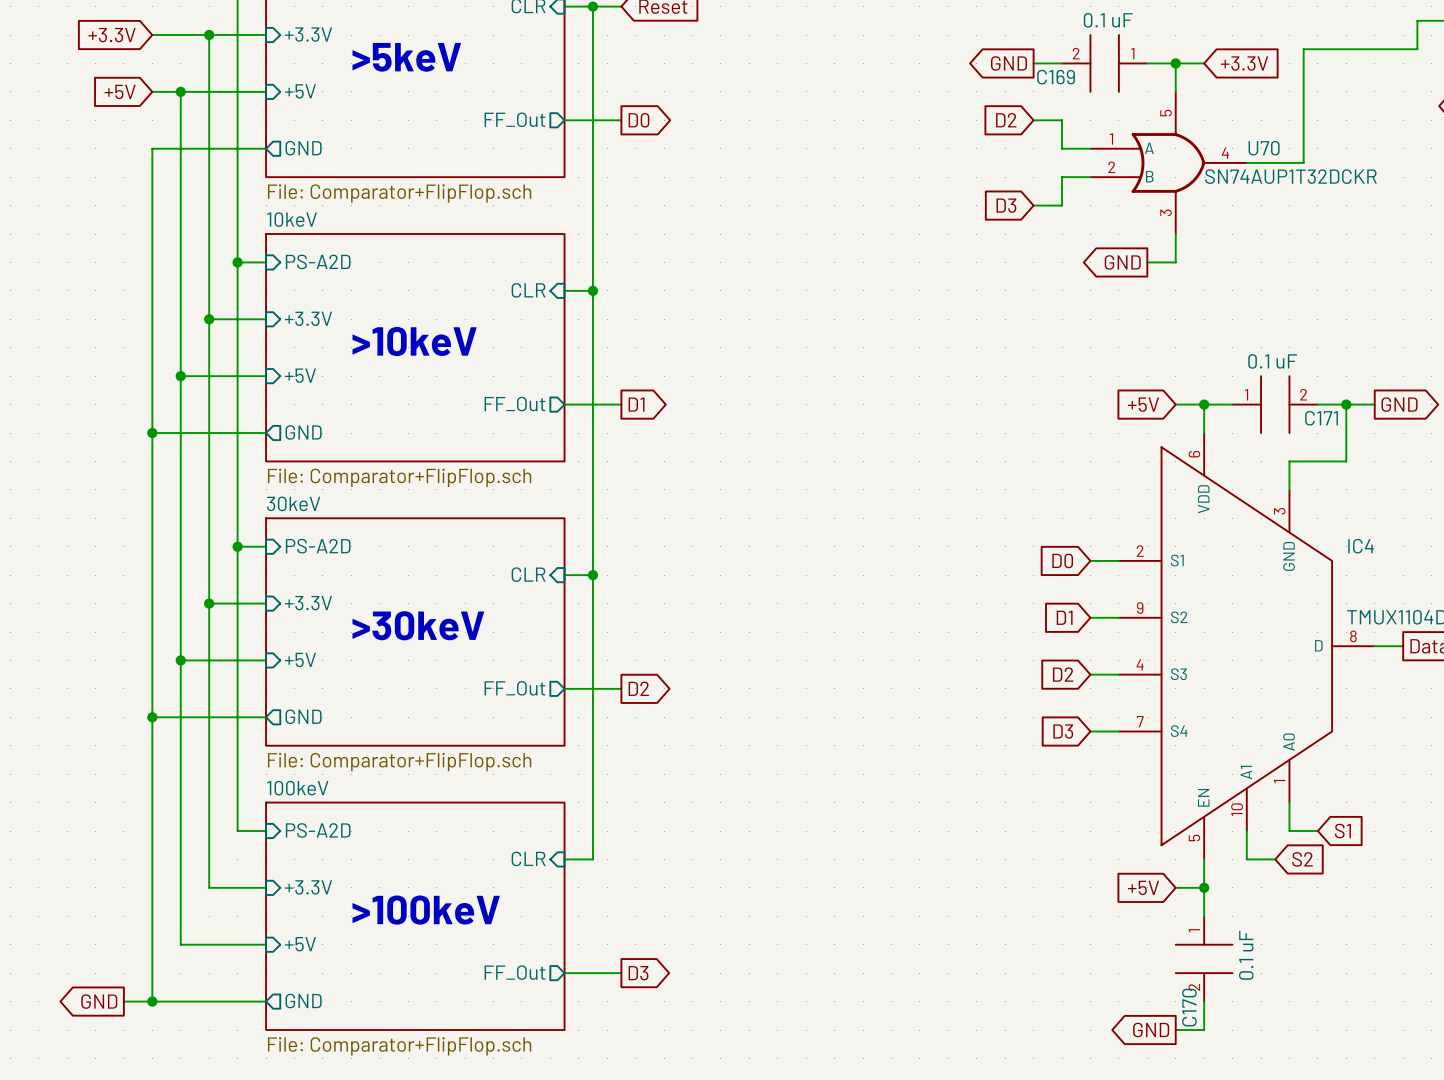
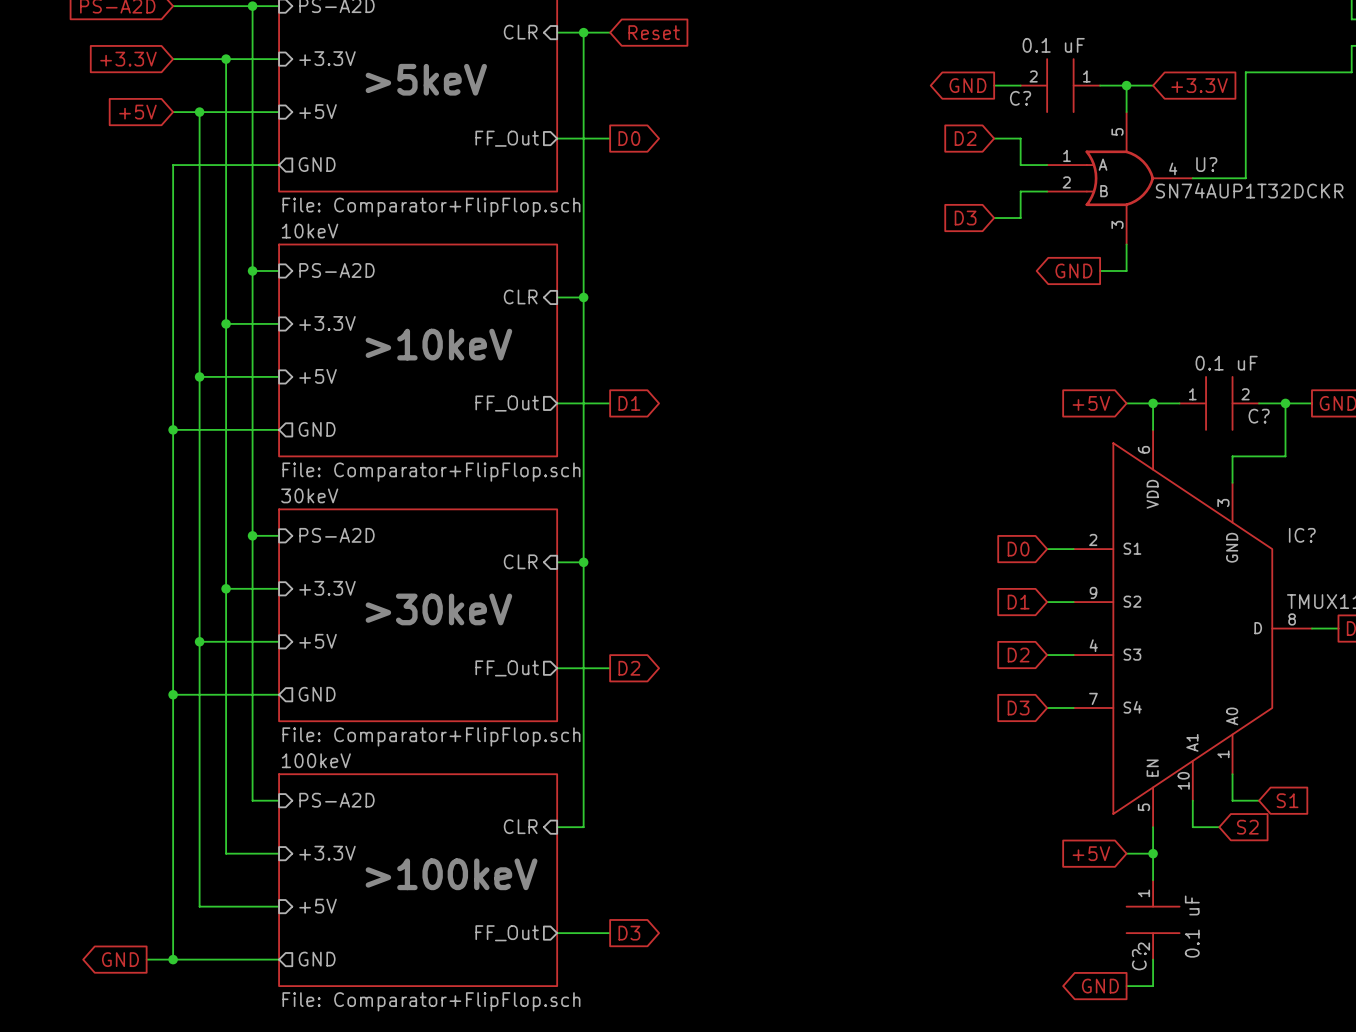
C169 name: C169 (1056, 77) -> C? (1020, 98)
U70 name: U70 (1264, 148) -> U? (1206, 164)
C171 name: C171 (1321, 418) -> C? (1259, 416)
IC4 name: IC4 (1361, 546) -> IC? (1302, 535)
C170 name: C170 (1189, 1007) -> C? (1139, 959)

